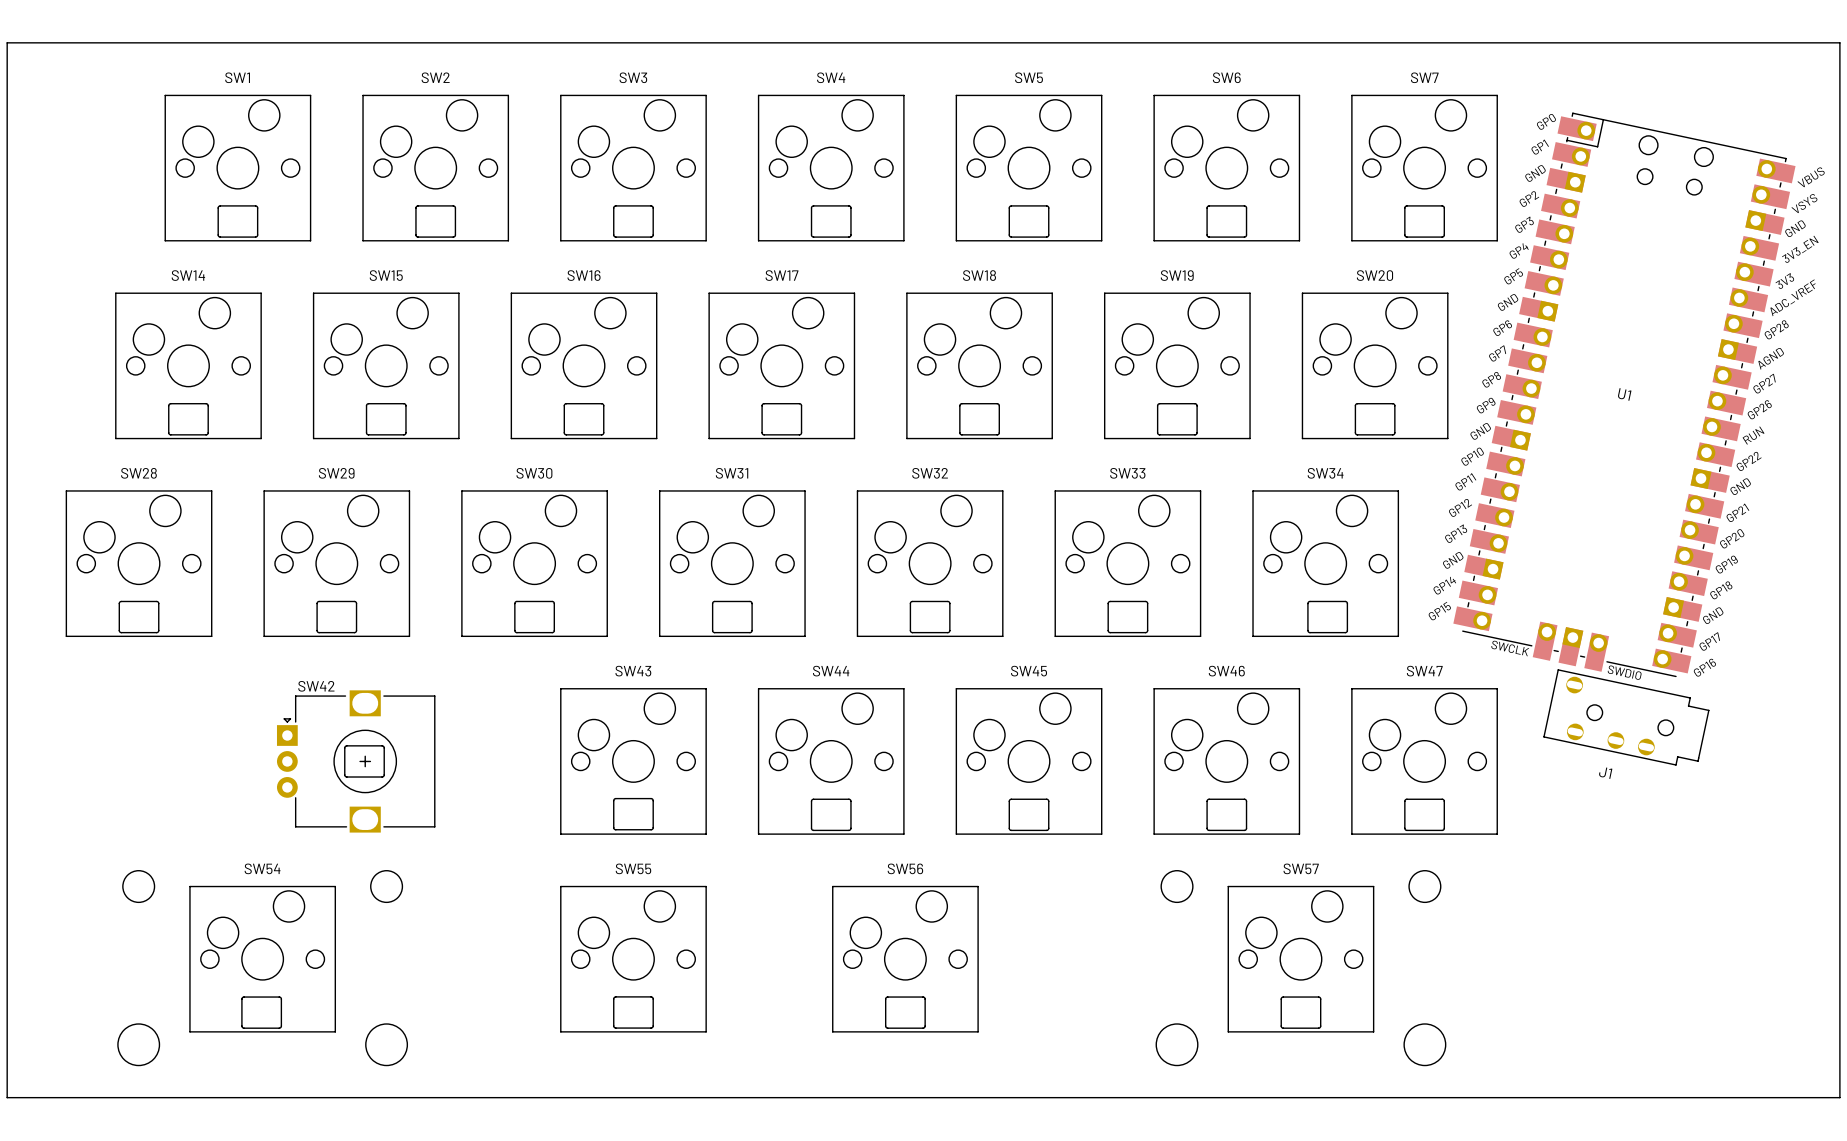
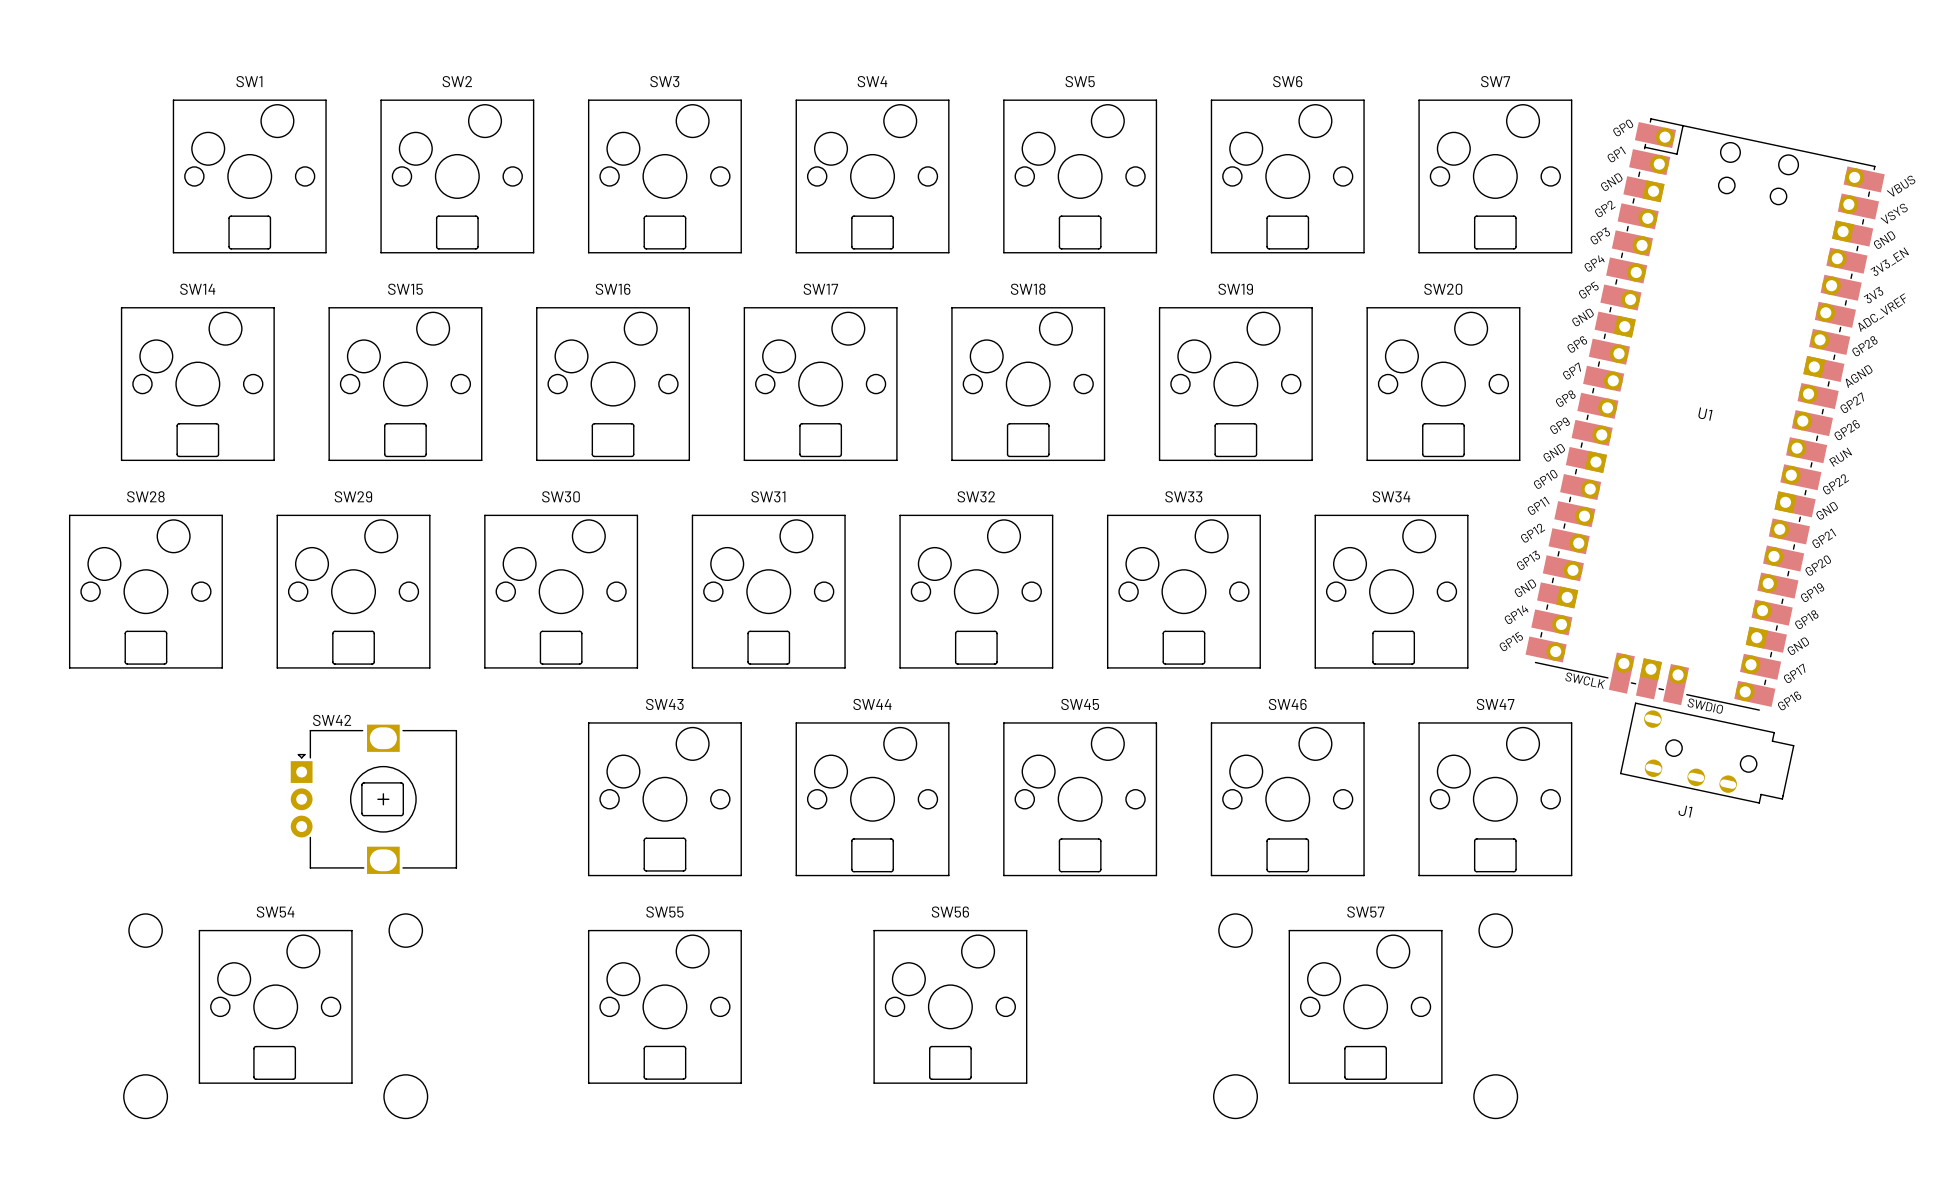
board edge: (7, 42) (1839, 42) (1839, 1097) (7, 1097) (7, 42) -> none

